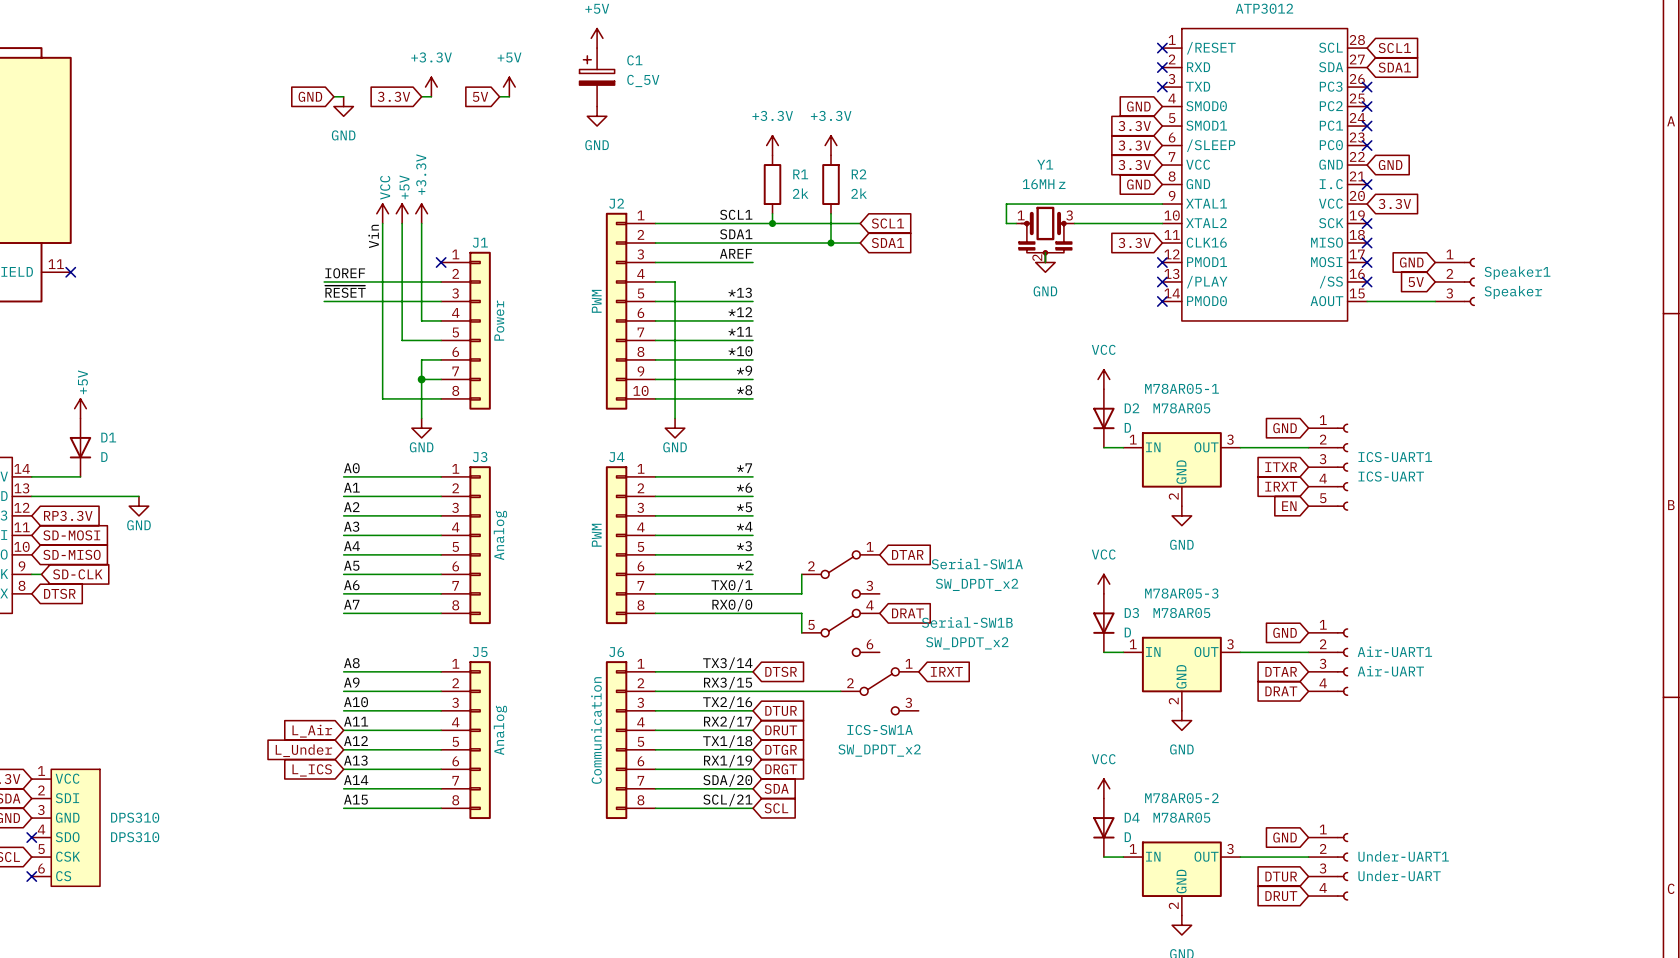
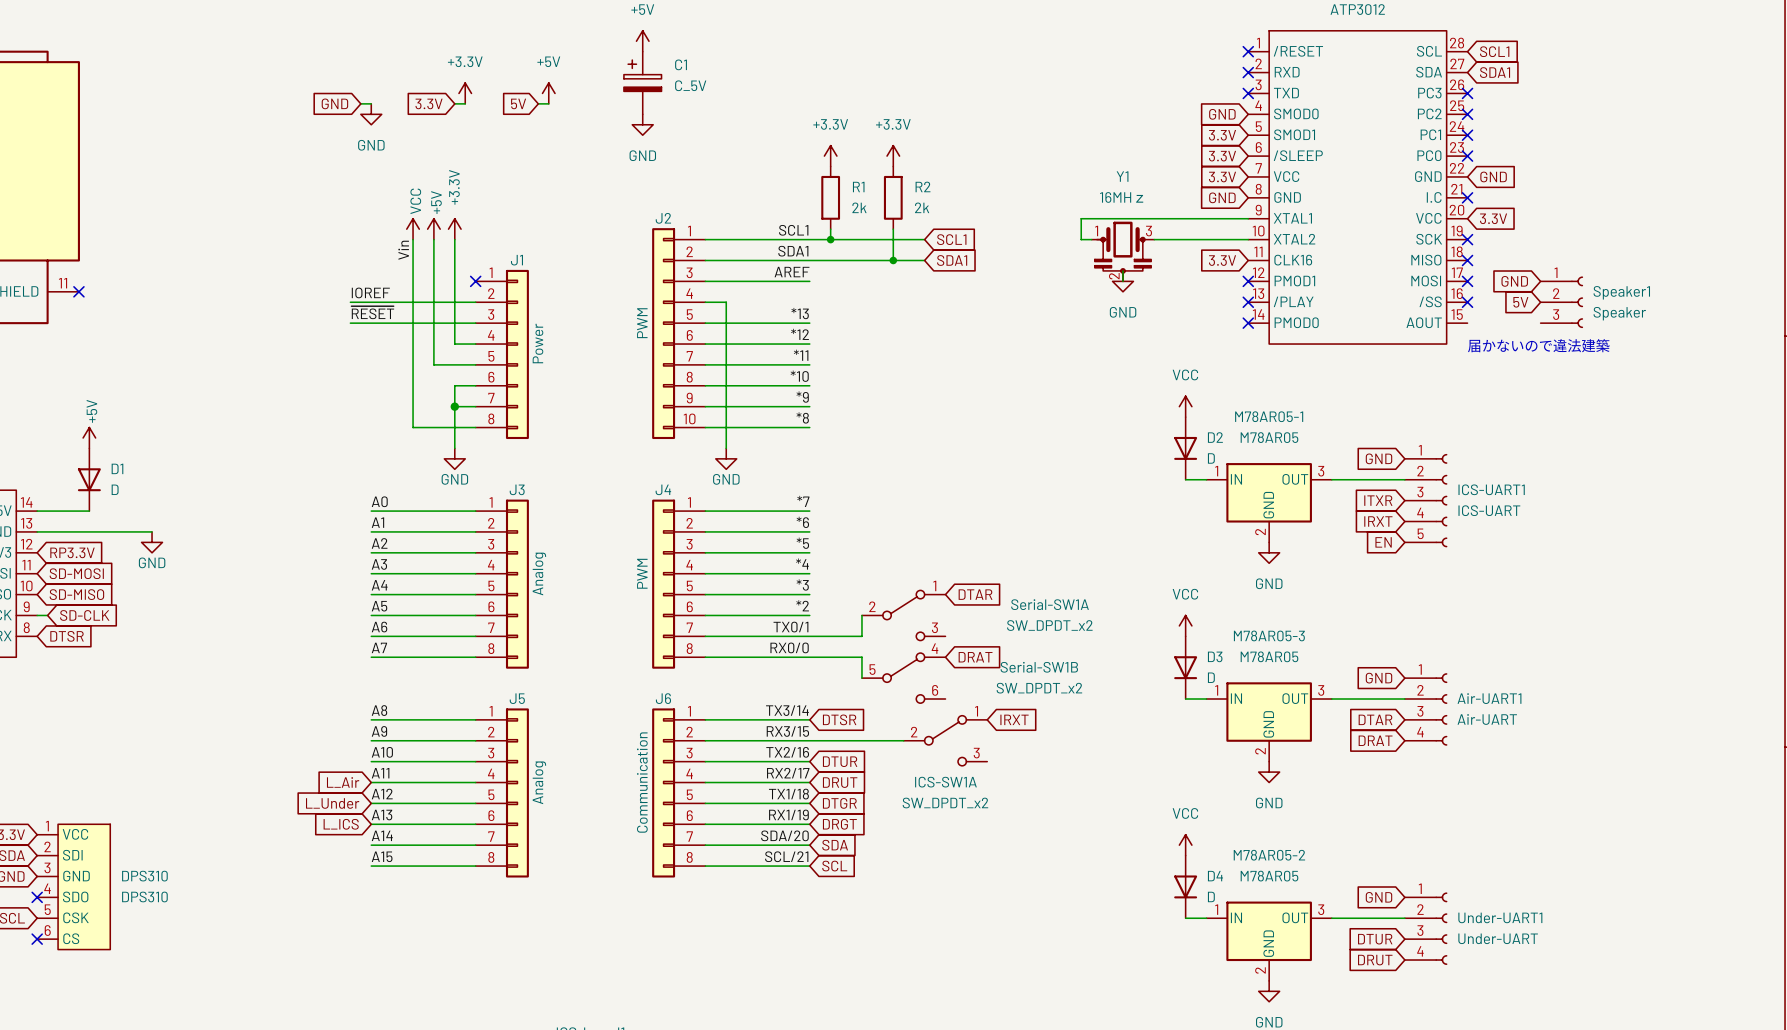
wire: (1367, 301) (1435, 301) -> none
text: none -> 届かないので違法建築 (1538, 345)

